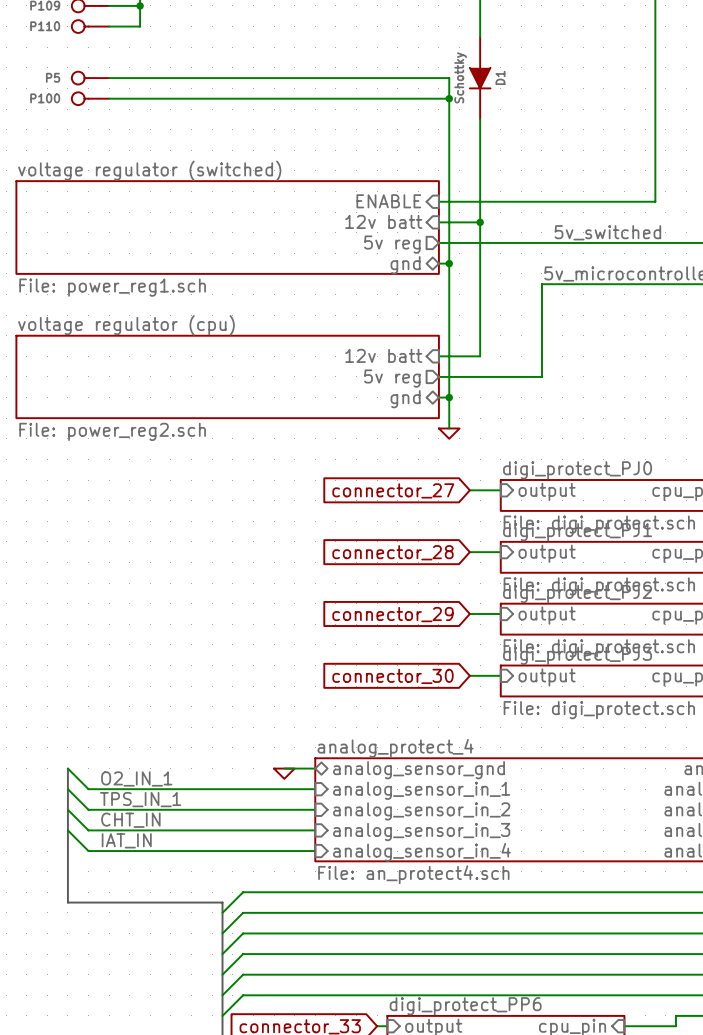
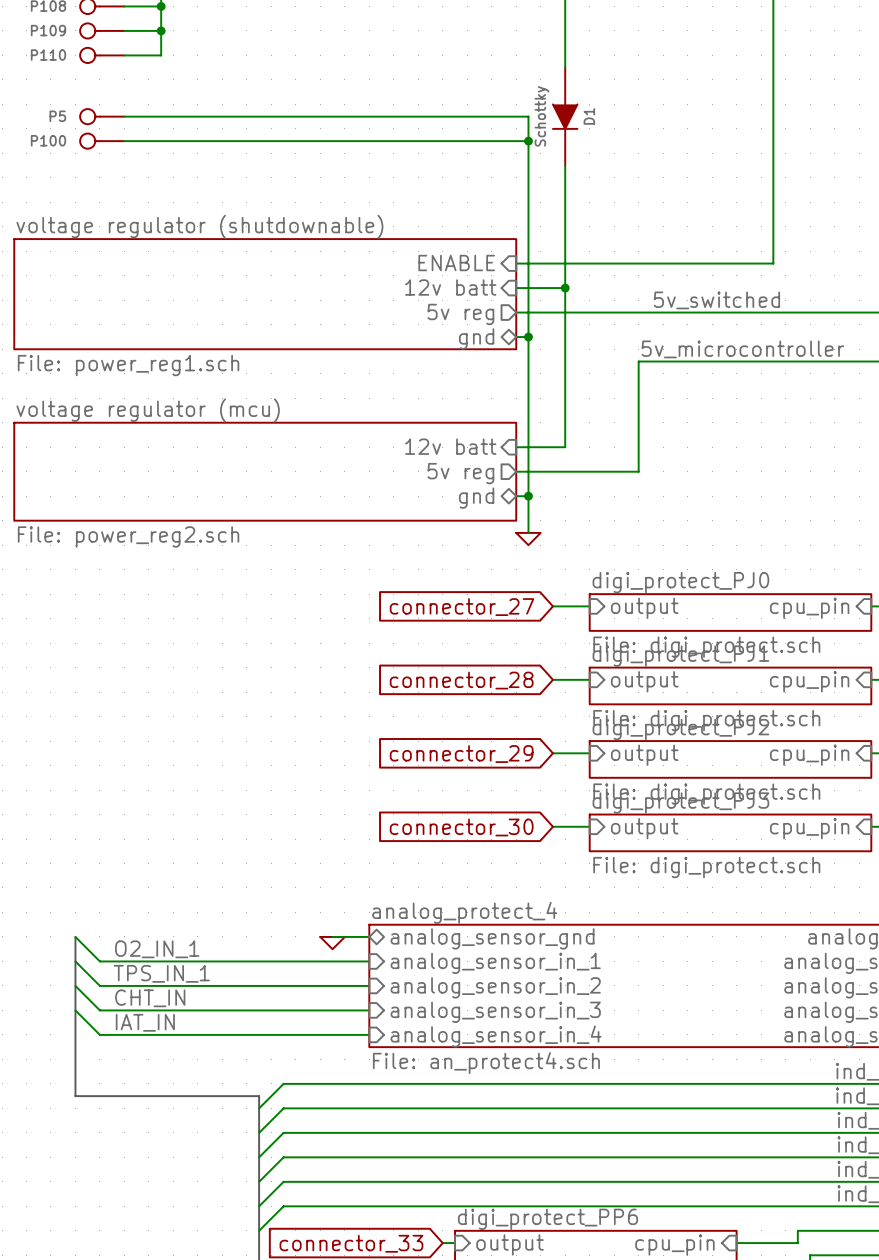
sheet voltage regulator (switched) name: voltage regulator (switched) (149, 170) -> voltage regulator (shutdownable) (199, 226)
sheet voltage regulator (cpu) name: voltage regulator (cpu) (126, 325) -> voltage regulator (mcu) (148, 410)

